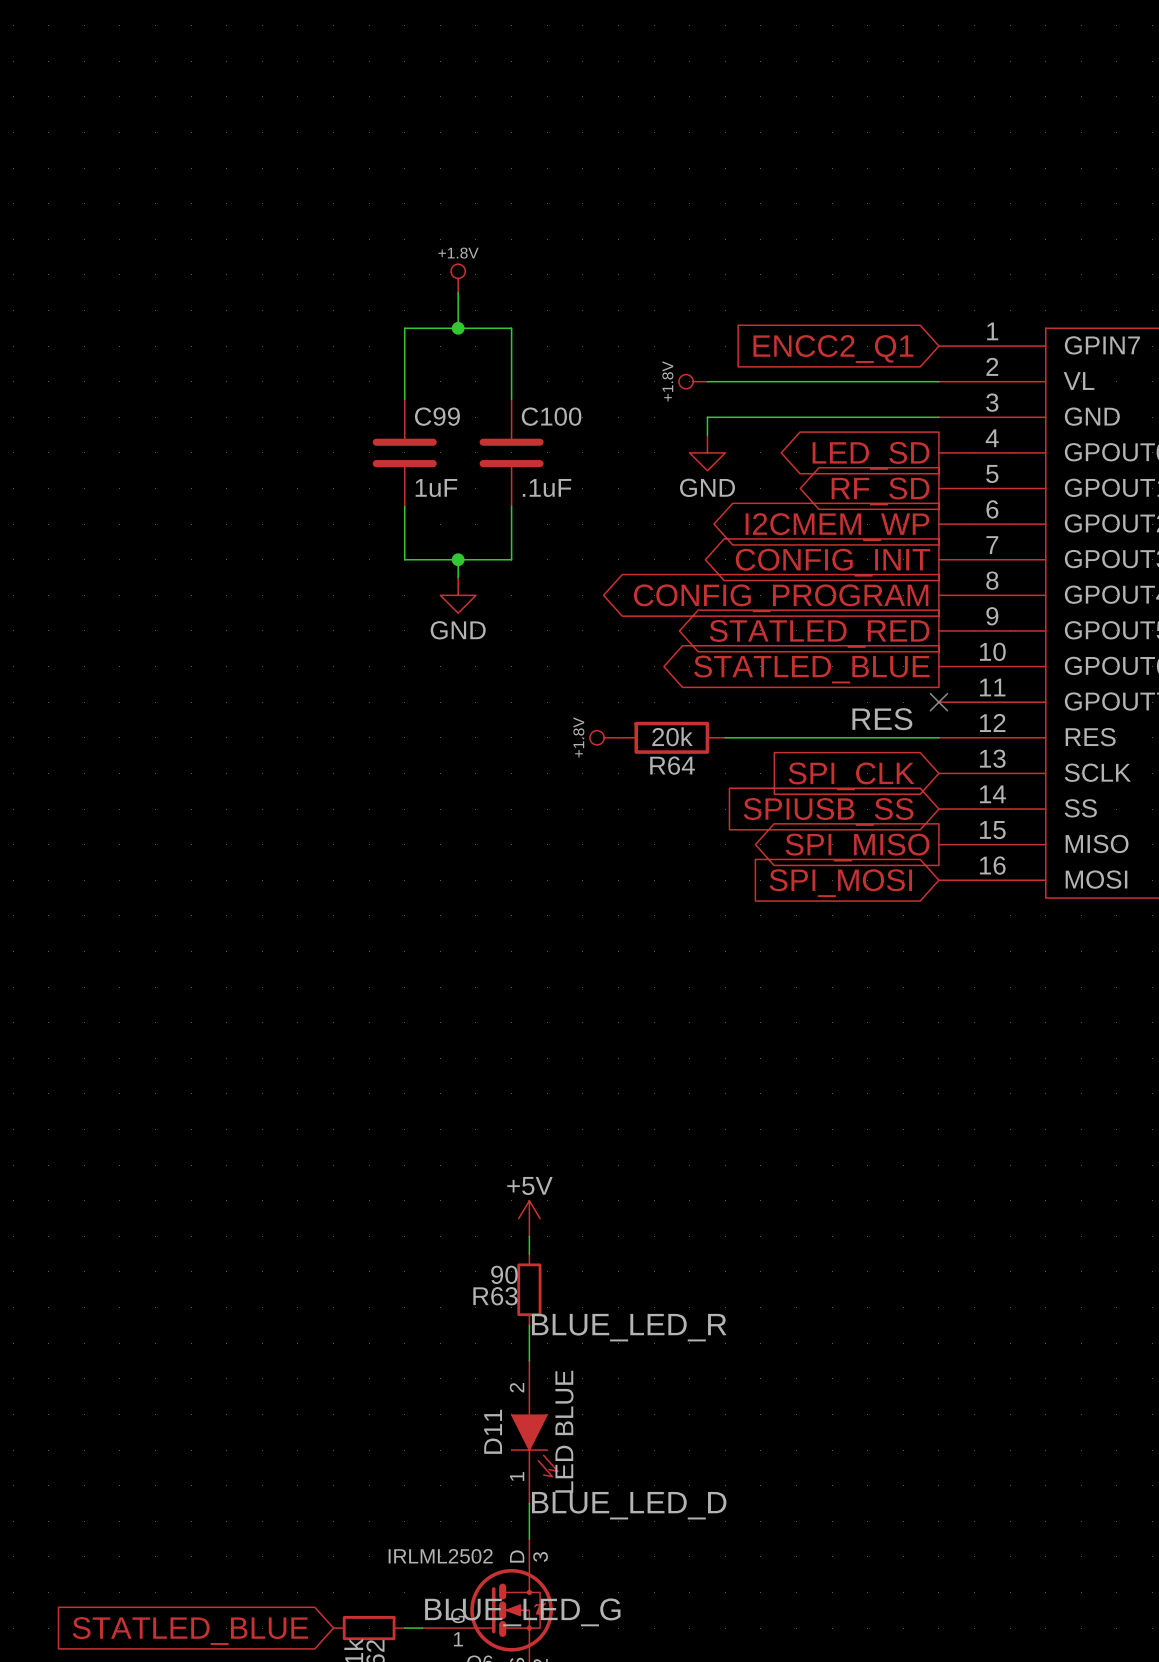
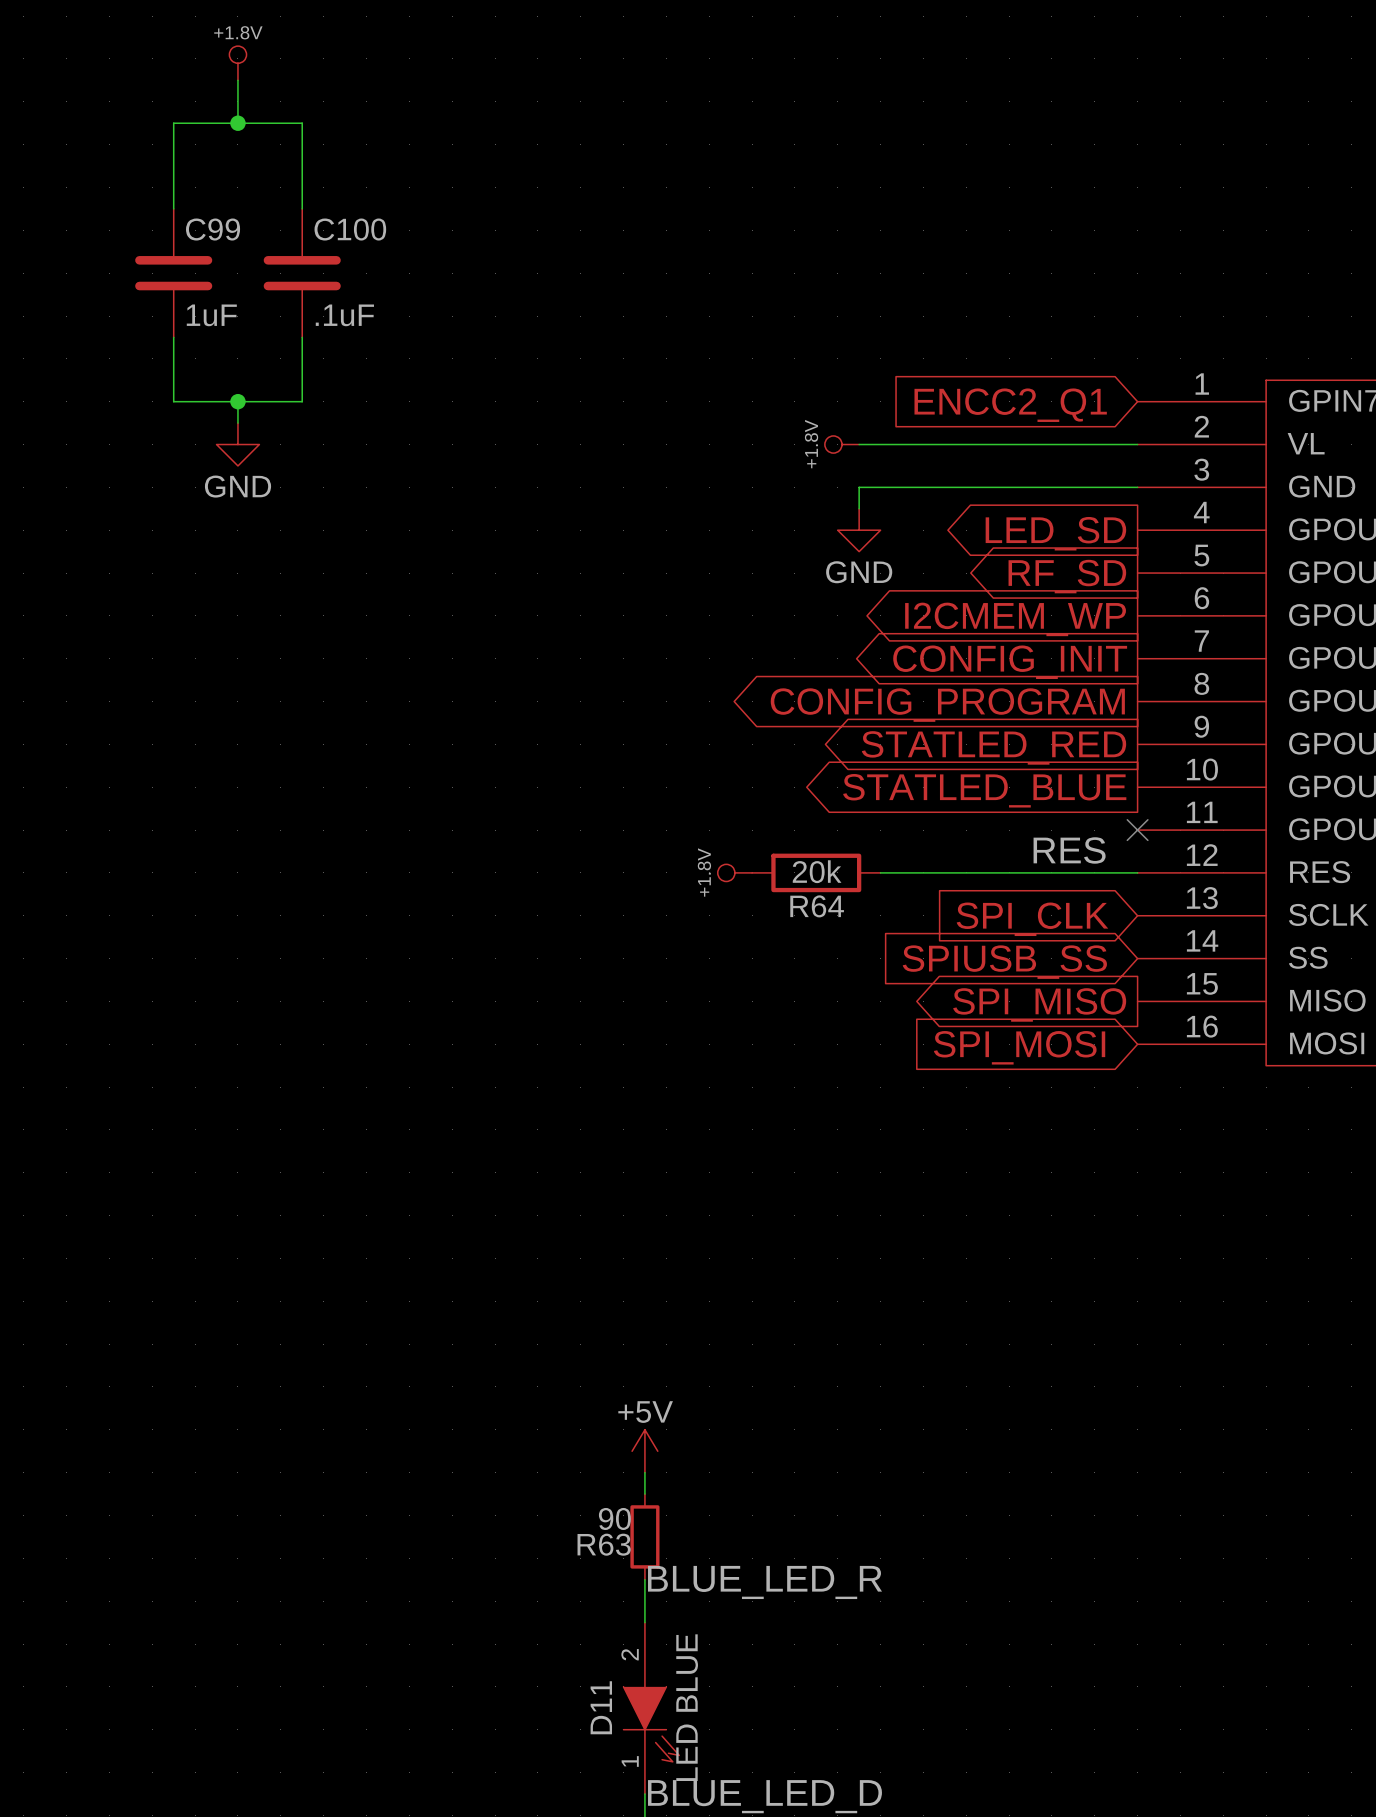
junction: none -> (237, 123)
power symbol position: +1.8V (458, 278) -> +1.8V (237, 63)
wire: (458, 292) (458, 328) -> (237, 80) (237, 123)
junction: (458, 328) -> none
junction: none -> (237, 401)
wire: (404, 399) (404, 328) (511, 328) (511, 399) -> (173, 208) (173, 123) (302, 123) (302, 208)
C99 position: (404, 452) -> (173, 273)
C100 position: (511, 452) -> (302, 273)
wire: (404, 506) (404, 559) (511, 559) (511, 506) -> (173, 337) (173, 401) (302, 401) (302, 337)
wire: (458, 559) (458, 577) -> (237, 401) (237, 423)
junction: (458, 559) -> none
power symbol position: GND (458, 595) -> GND (237, 444)

